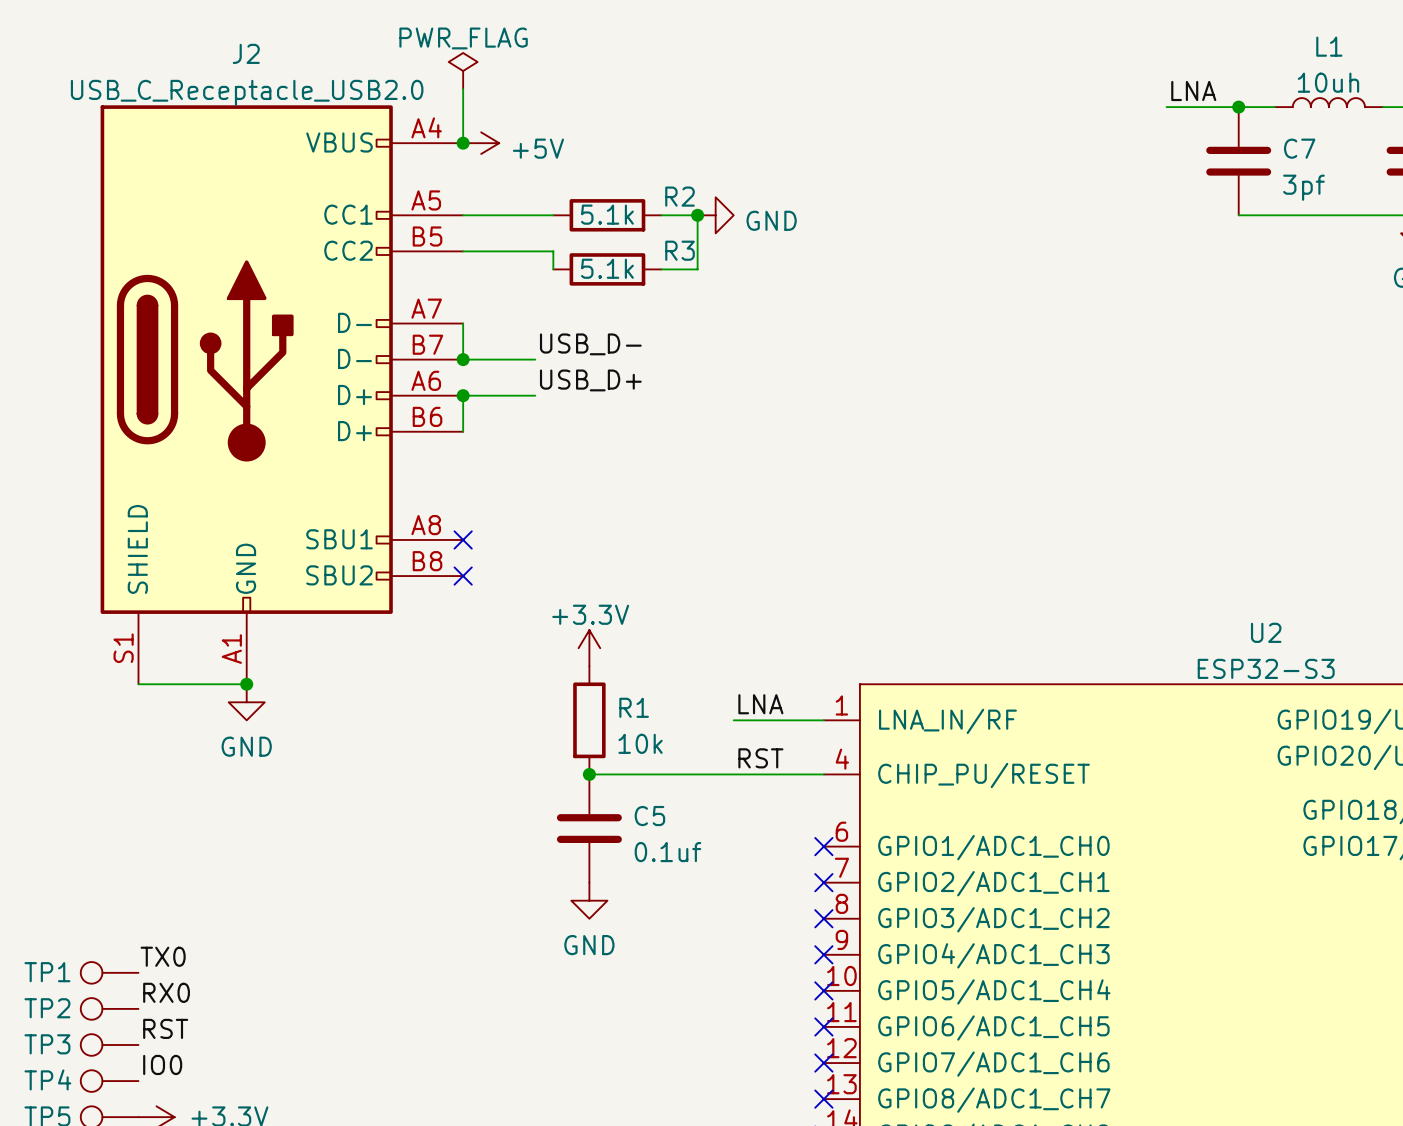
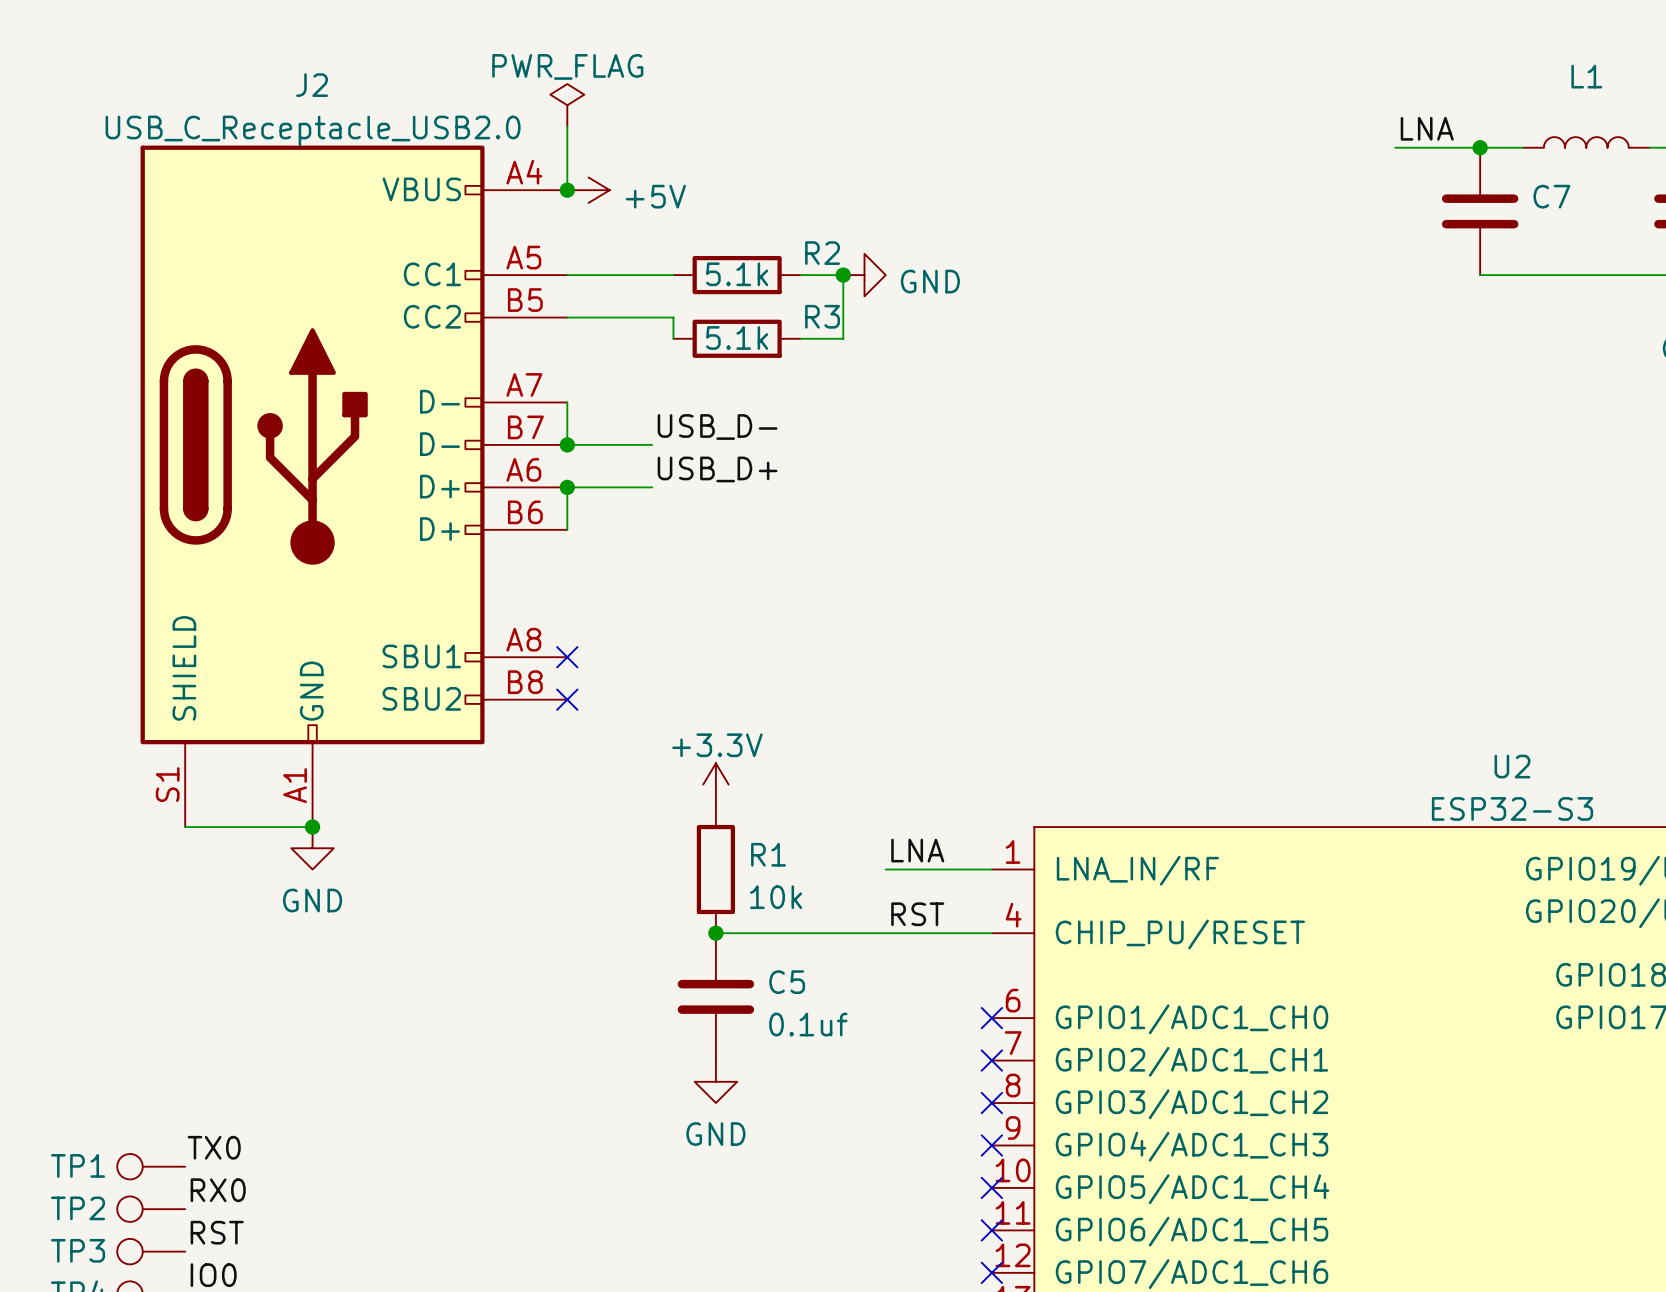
L1 value: 10uh (1328, 82) -> none
C7 value: 3pf (1303, 187) -> none

